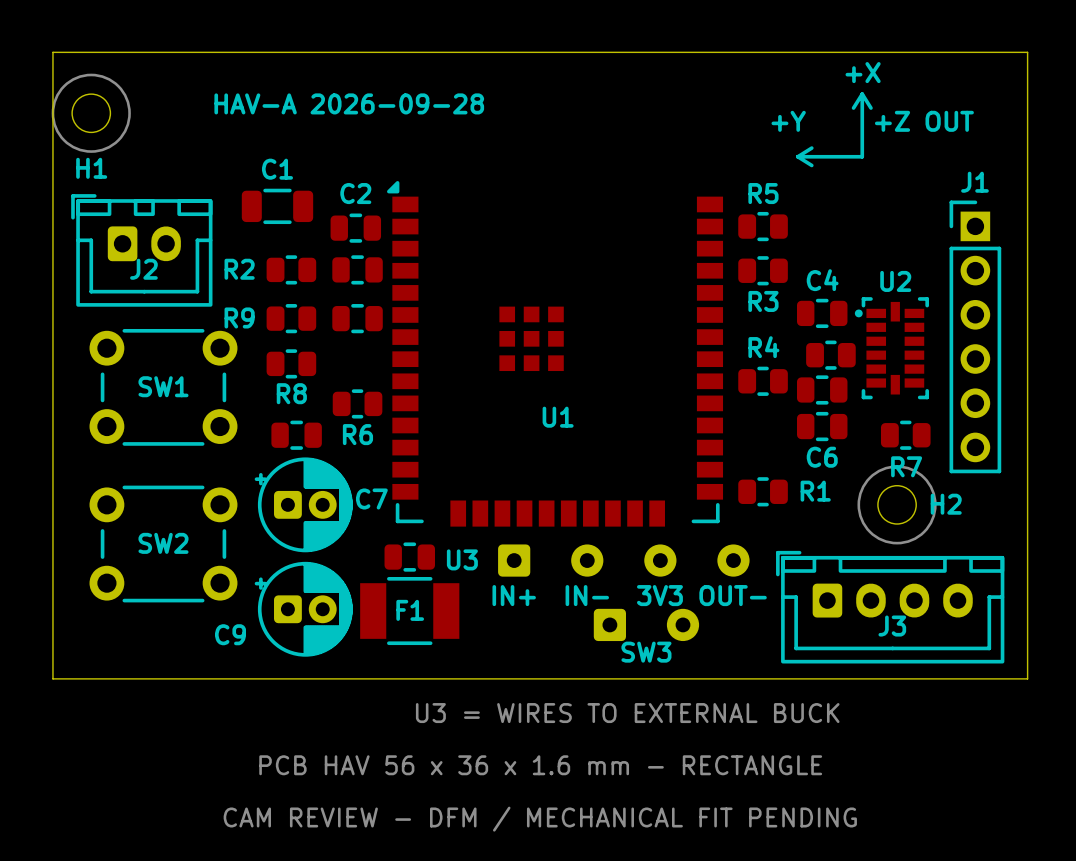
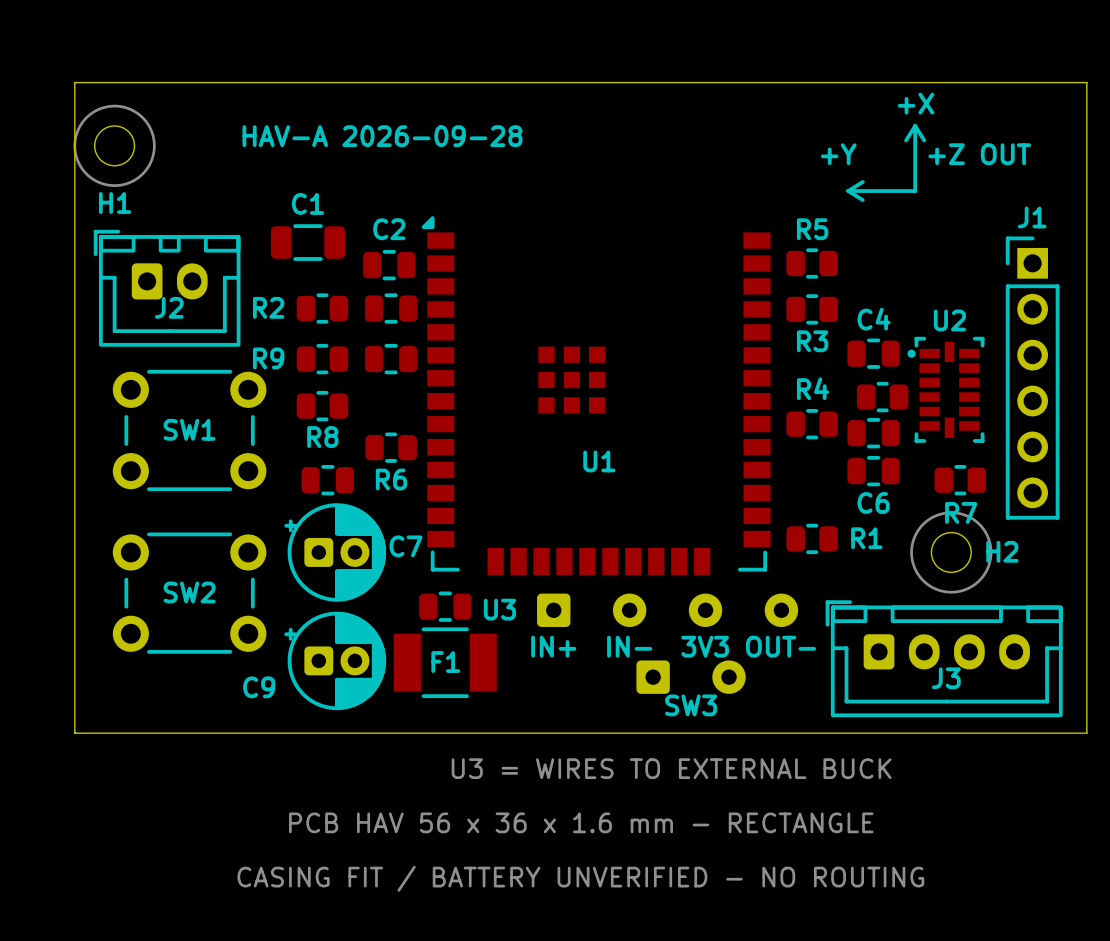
text: CAM REVIEW - DFM / MECHANICAL FIT PENDING (540, 819) -> CASING FIT / BATTERY UNVERIFIED - NO ROUTING (580, 878)

